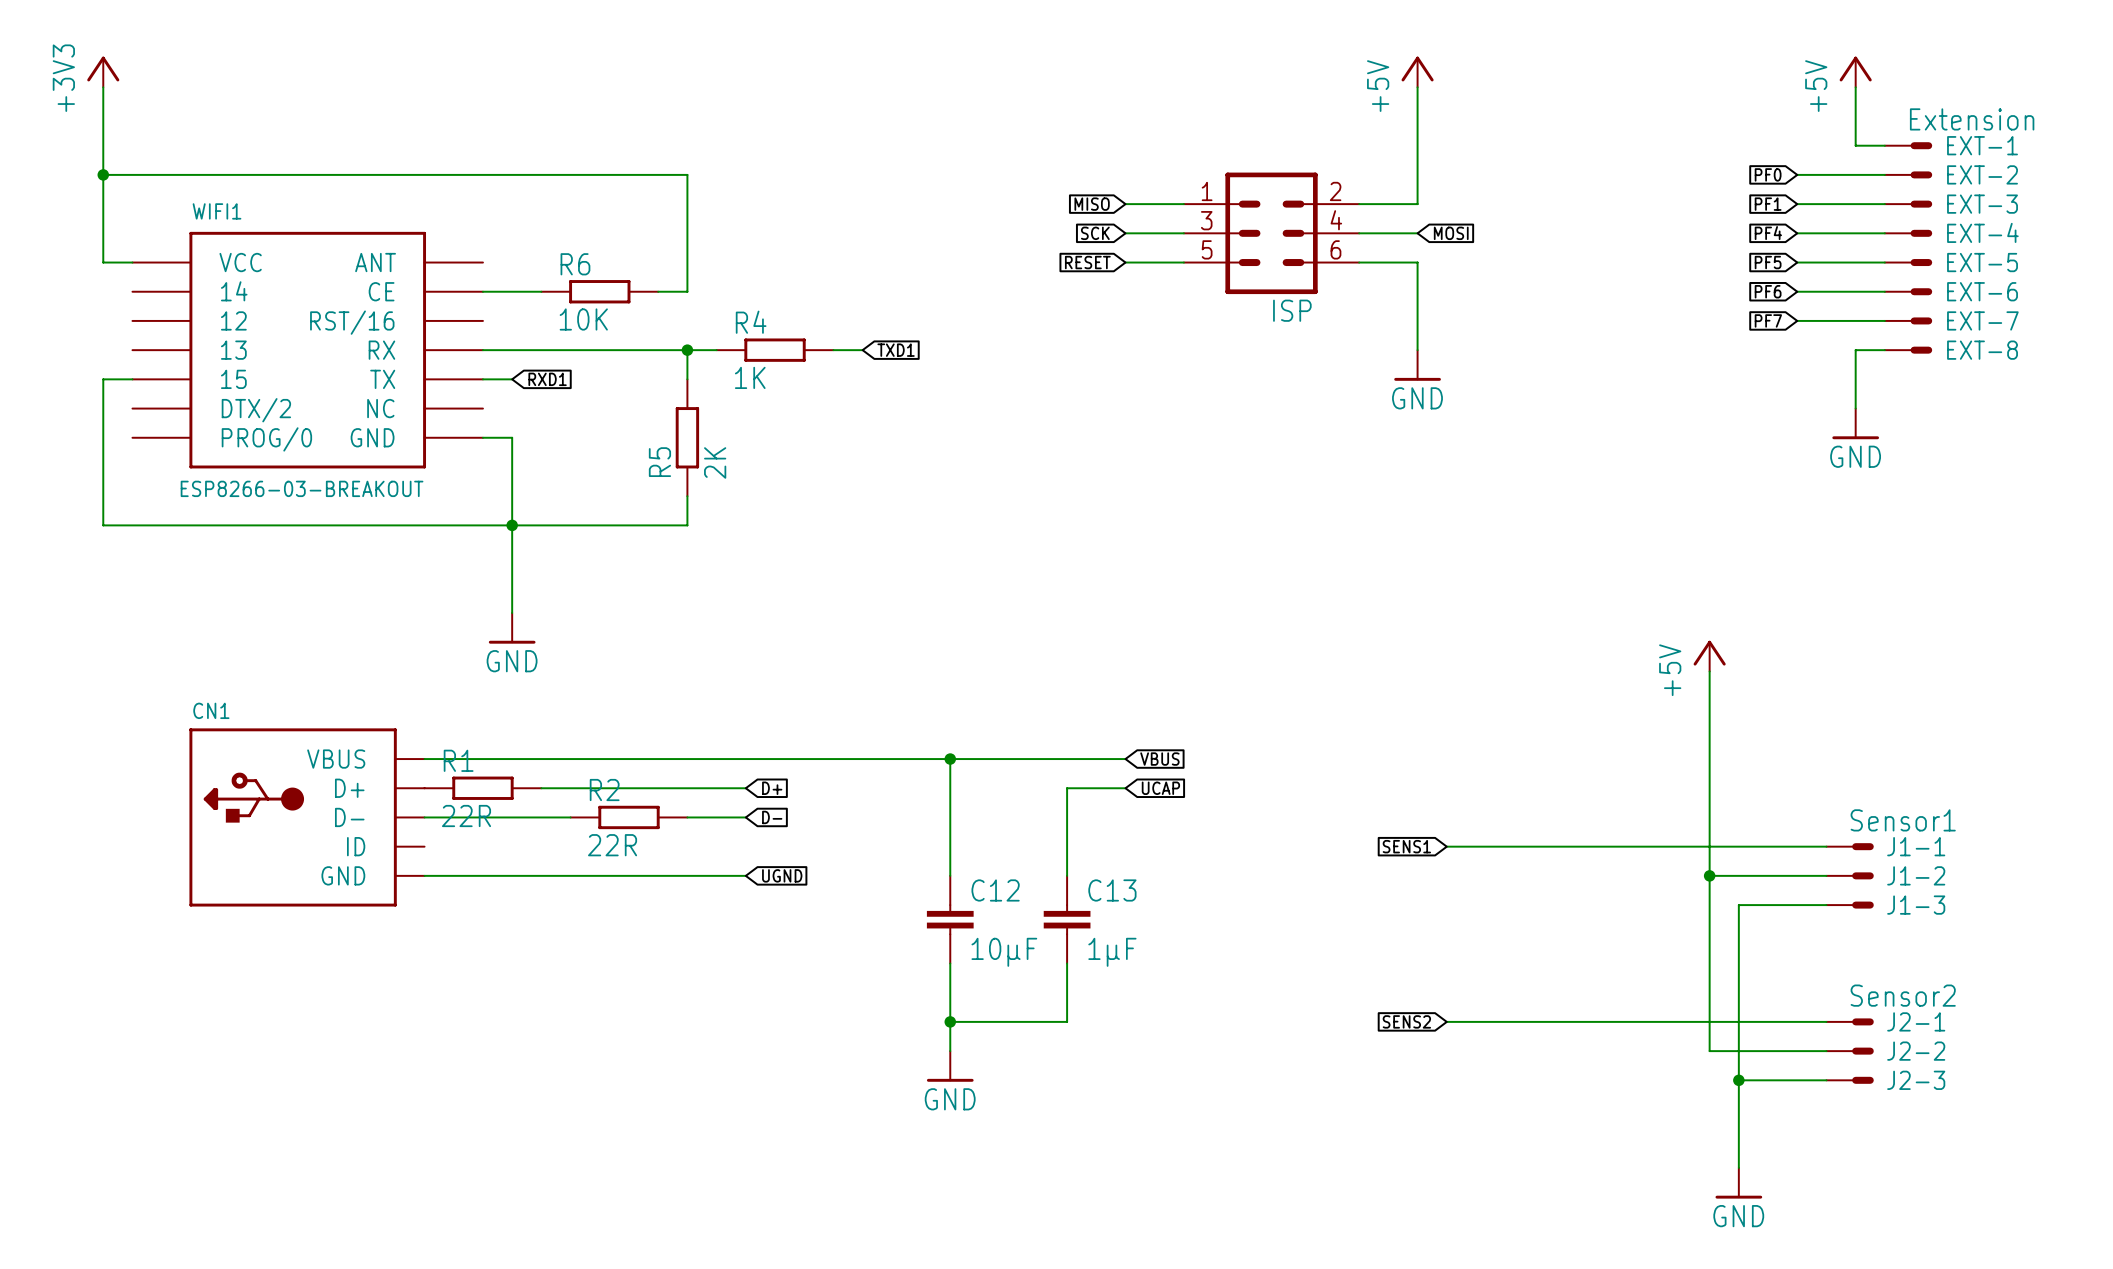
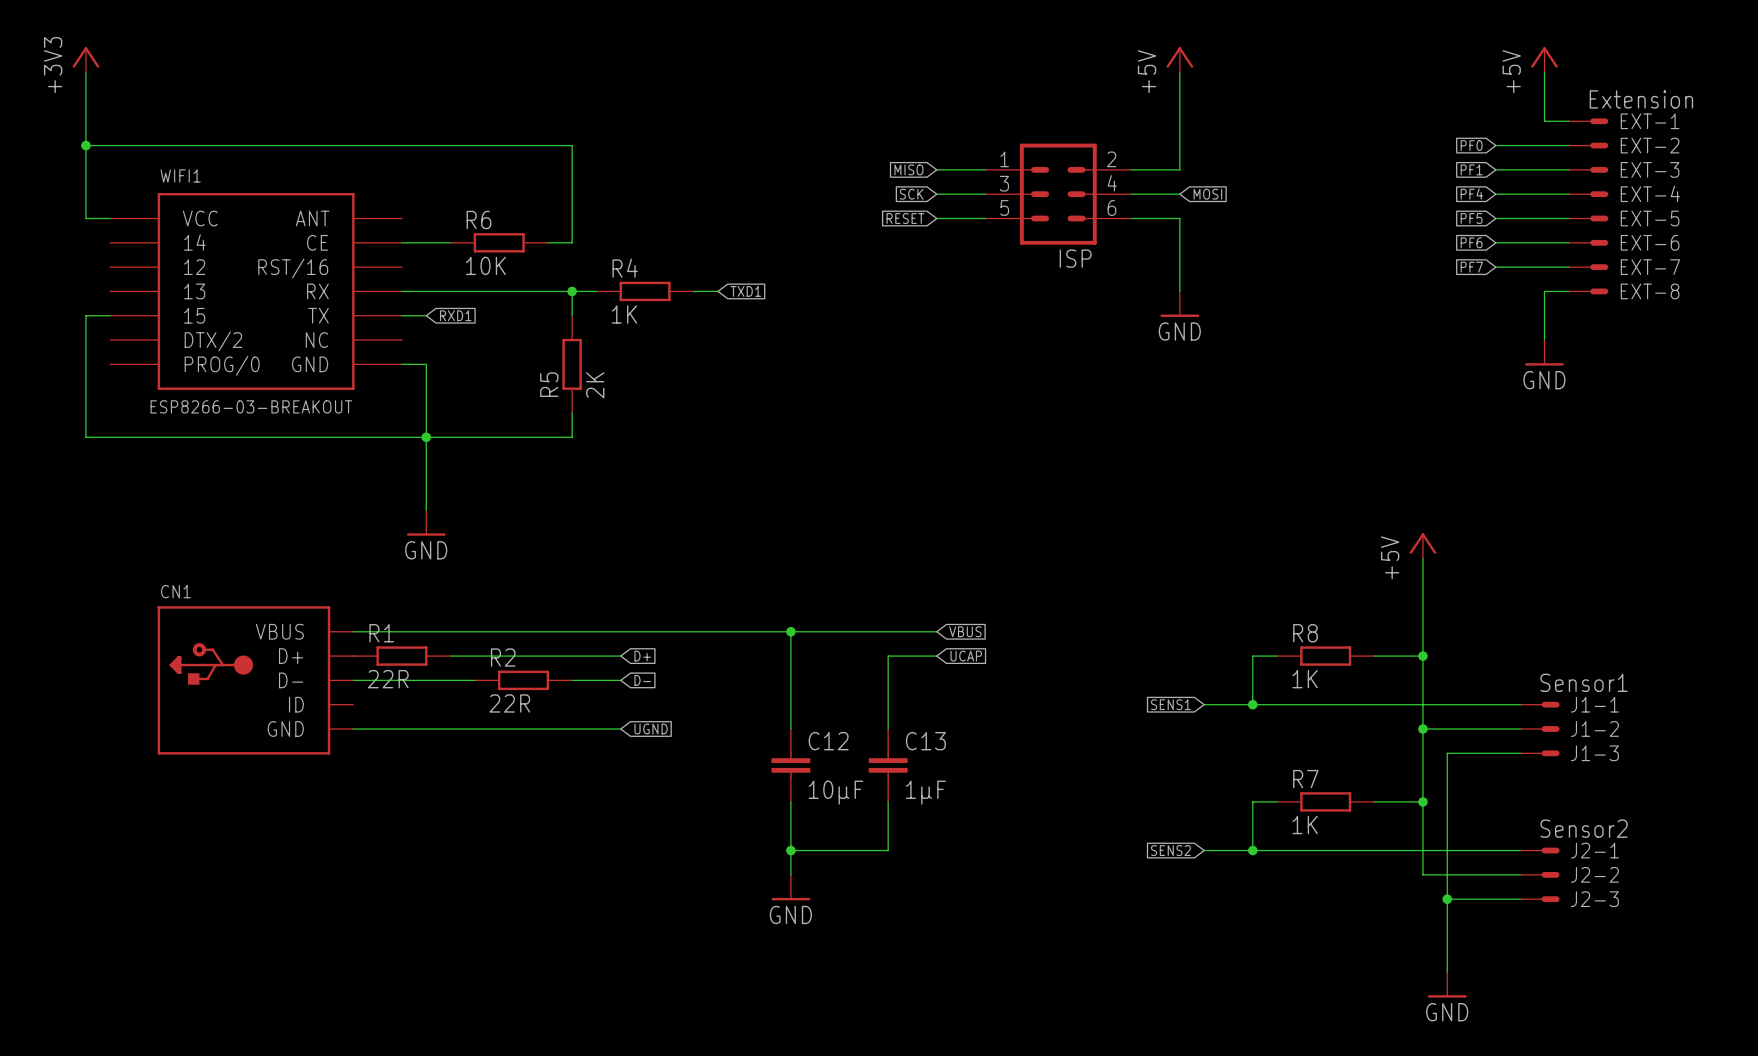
wire: none -> (1277, 656) (1252, 656) (1252, 704)
R8: none -> 1K (1325, 656)
wire: none -> (1374, 656) (1422, 656)
junction: none -> (1422, 656)
junction: none -> (1252, 704)
wire: none -> (1277, 801) (1252, 801) (1252, 850)
R7: none -> 1K (1325, 801)
wire: none -> (1374, 801) (1422, 801)
junction: none -> (1422, 801)
junction: none -> (1252, 850)

